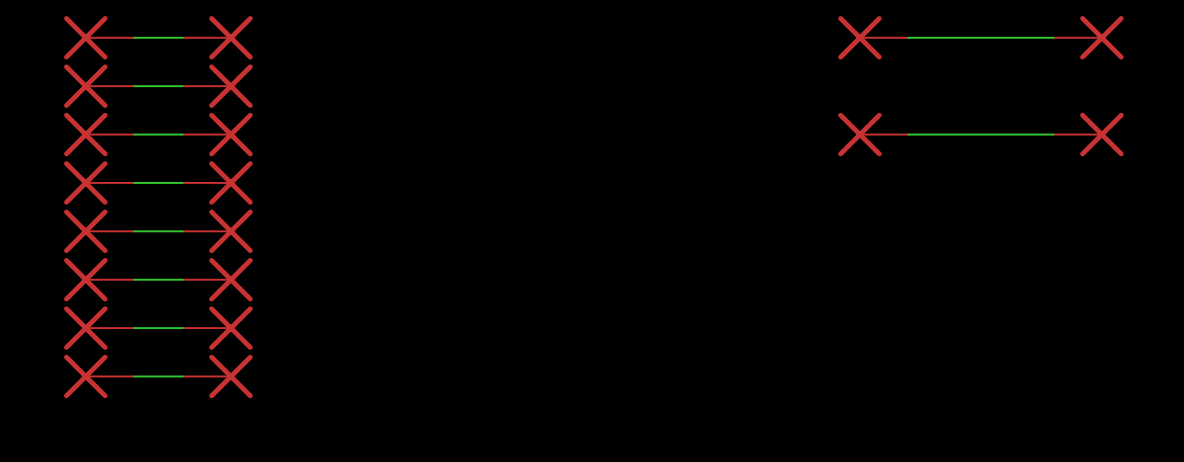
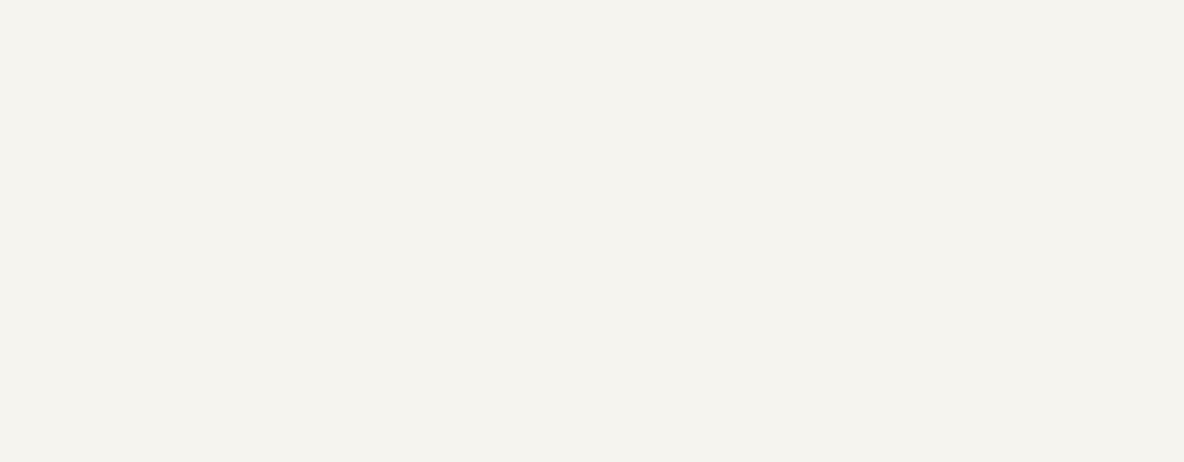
part: (99, 37) -> none
wire: (134, 37) (182, 37) -> none
part: (217, 37) -> none
part: (873, 37) -> none
wire: (908, 37) (1053, 37) -> none
part: (1088, 37) -> none
part: (99, 86) -> none
wire: (134, 86) (182, 86) -> none
part: (217, 86) -> none
part: (99, 134) -> none
wire: (134, 134) (182, 134) -> none
part: (217, 134) -> none
part: (873, 134) -> none
wire: (908, 134) (1053, 134) -> none
part: (1088, 134) -> none
part: (99, 182) -> none
wire: (134, 182) (182, 182) -> none
part: (217, 182) -> none
part: (99, 231) -> none
wire: (134, 231) (182, 231) -> none
part: (217, 231) -> none
part: (99, 279) -> none
wire: (134, 279) (182, 279) -> none
part: (217, 279) -> none
part: (99, 328) -> none
wire: (134, 328) (182, 328) -> none
part: (217, 328) -> none
part: (99, 376) -> none
wire: (134, 376) (182, 376) -> none
part: (217, 376) -> none

